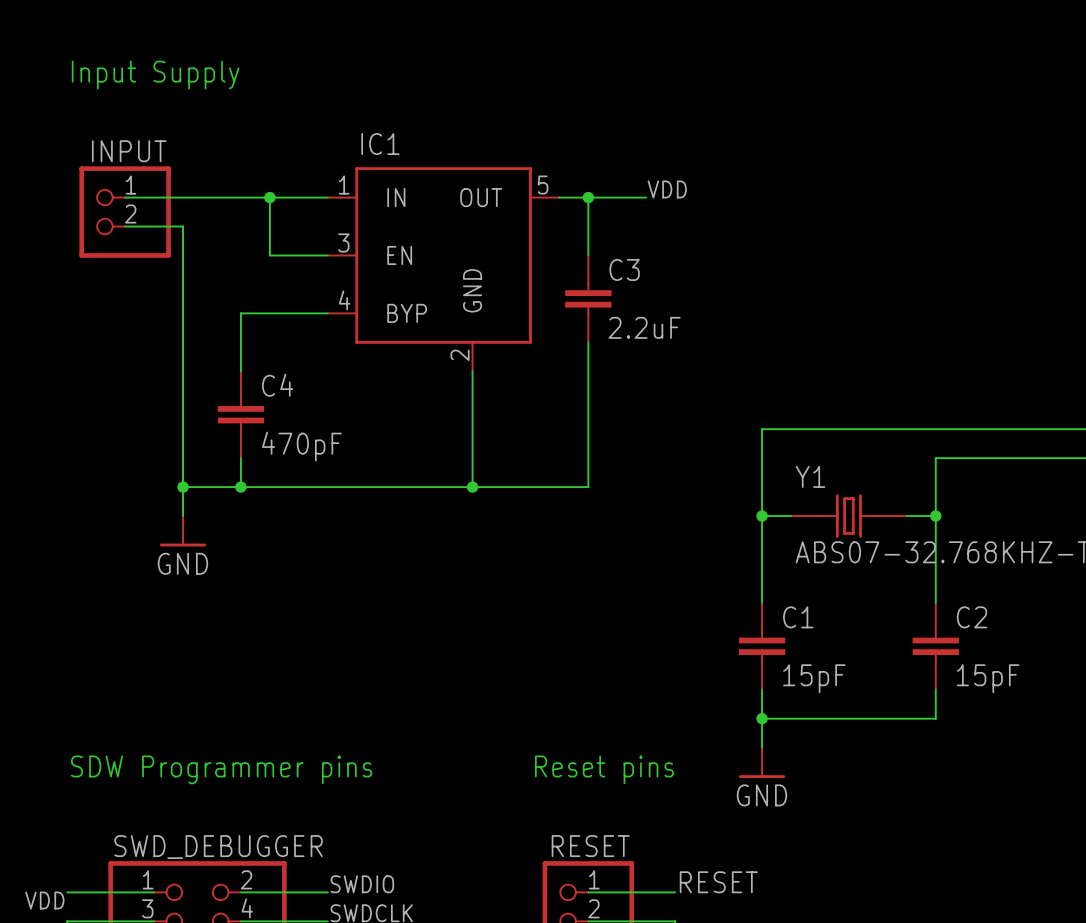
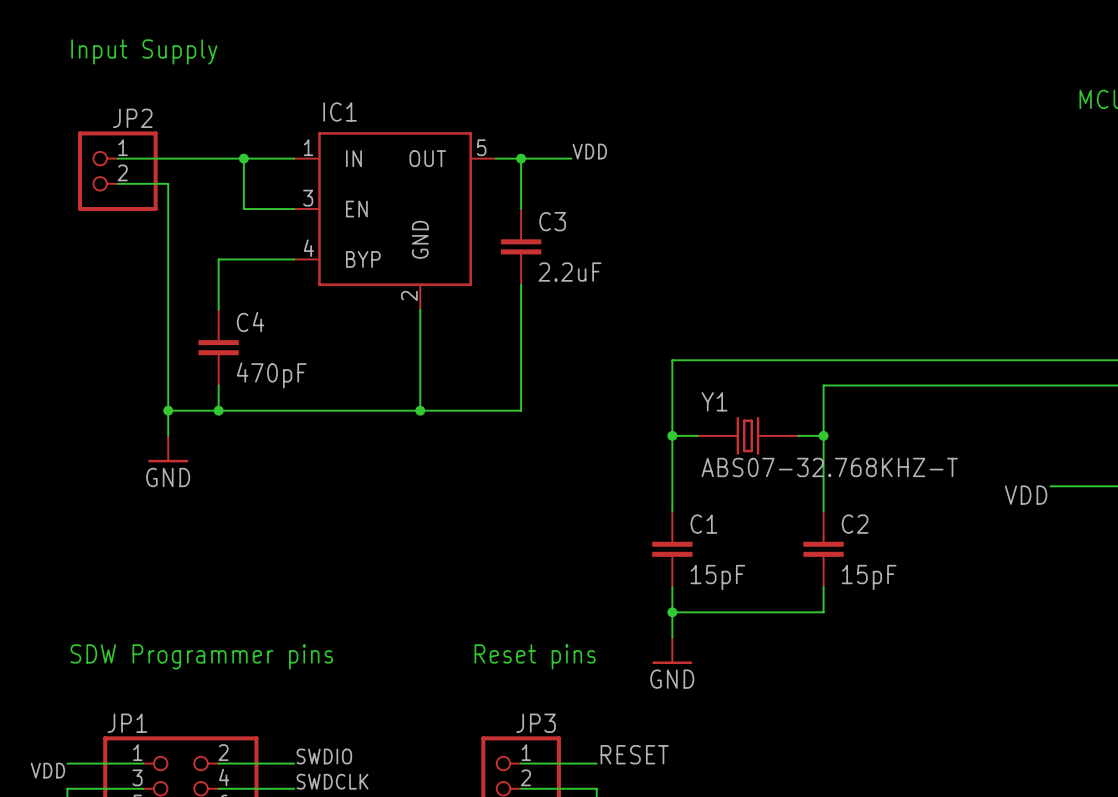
INPUT name: INPUT (129, 151) -> JP2 (132, 118)
RESET name: RESET (590, 846) -> JP3 (536, 723)
SWD_DEBUGGER name: SWD_DEBUGGER (218, 847) -> JP1 (127, 723)

